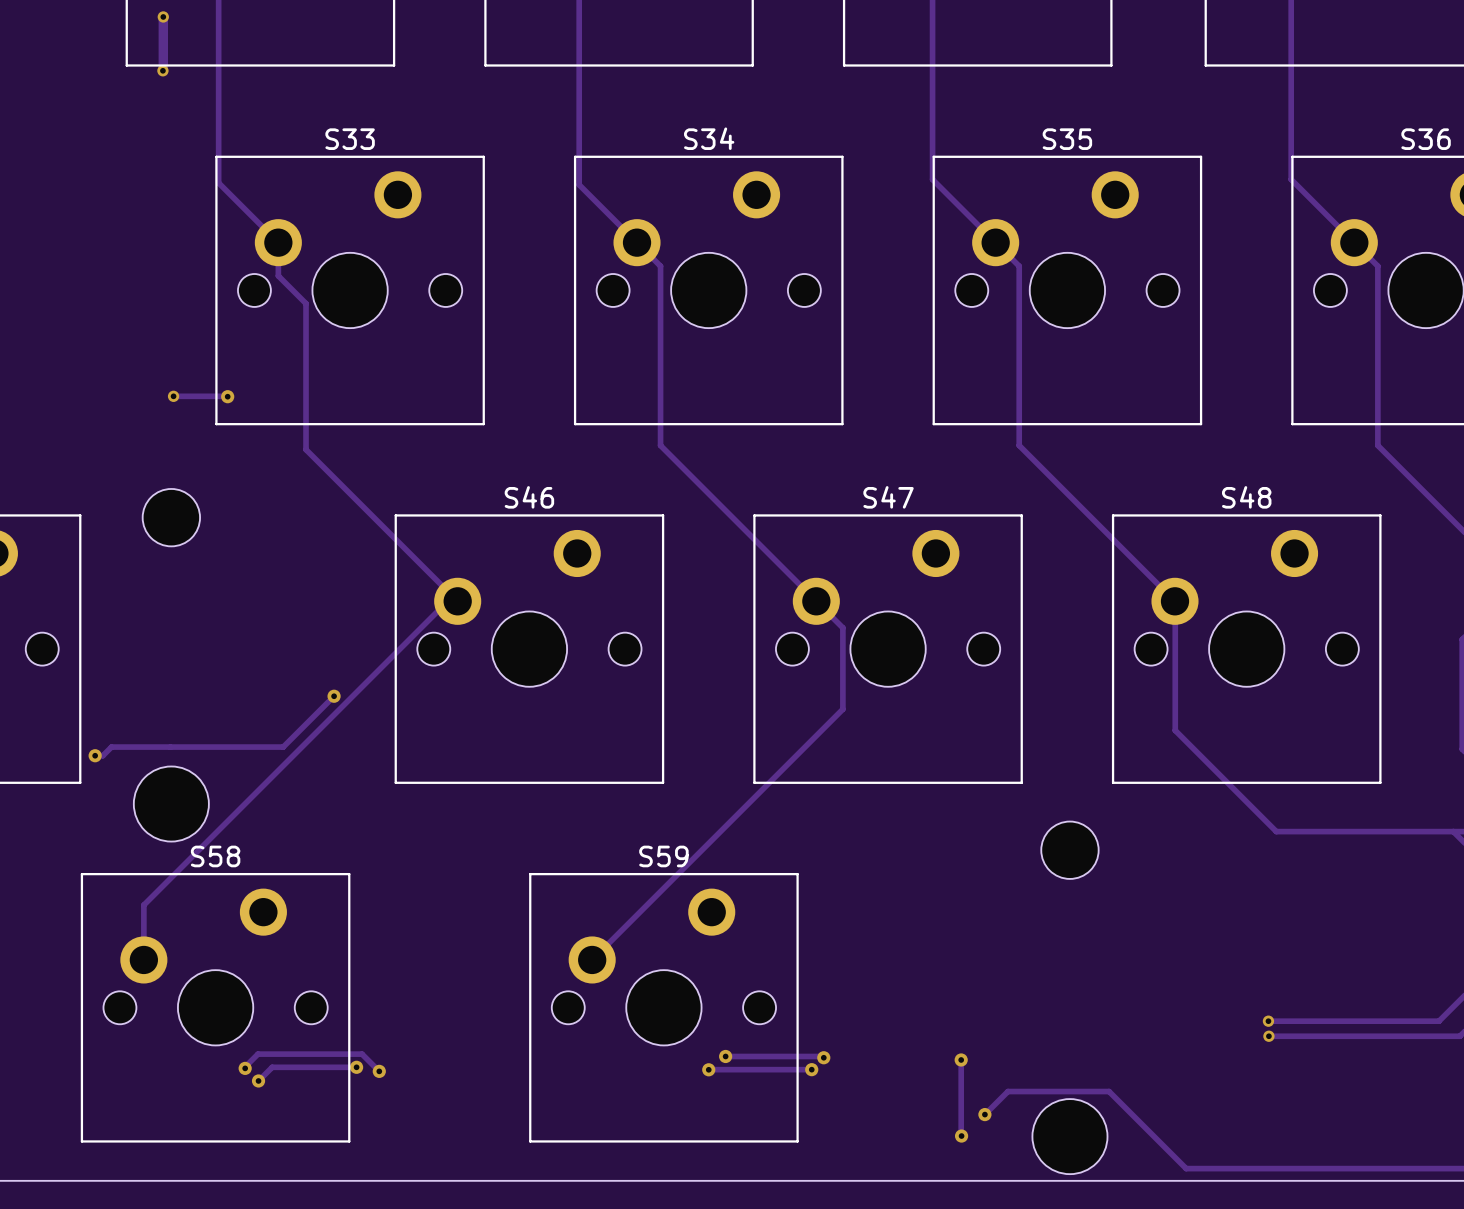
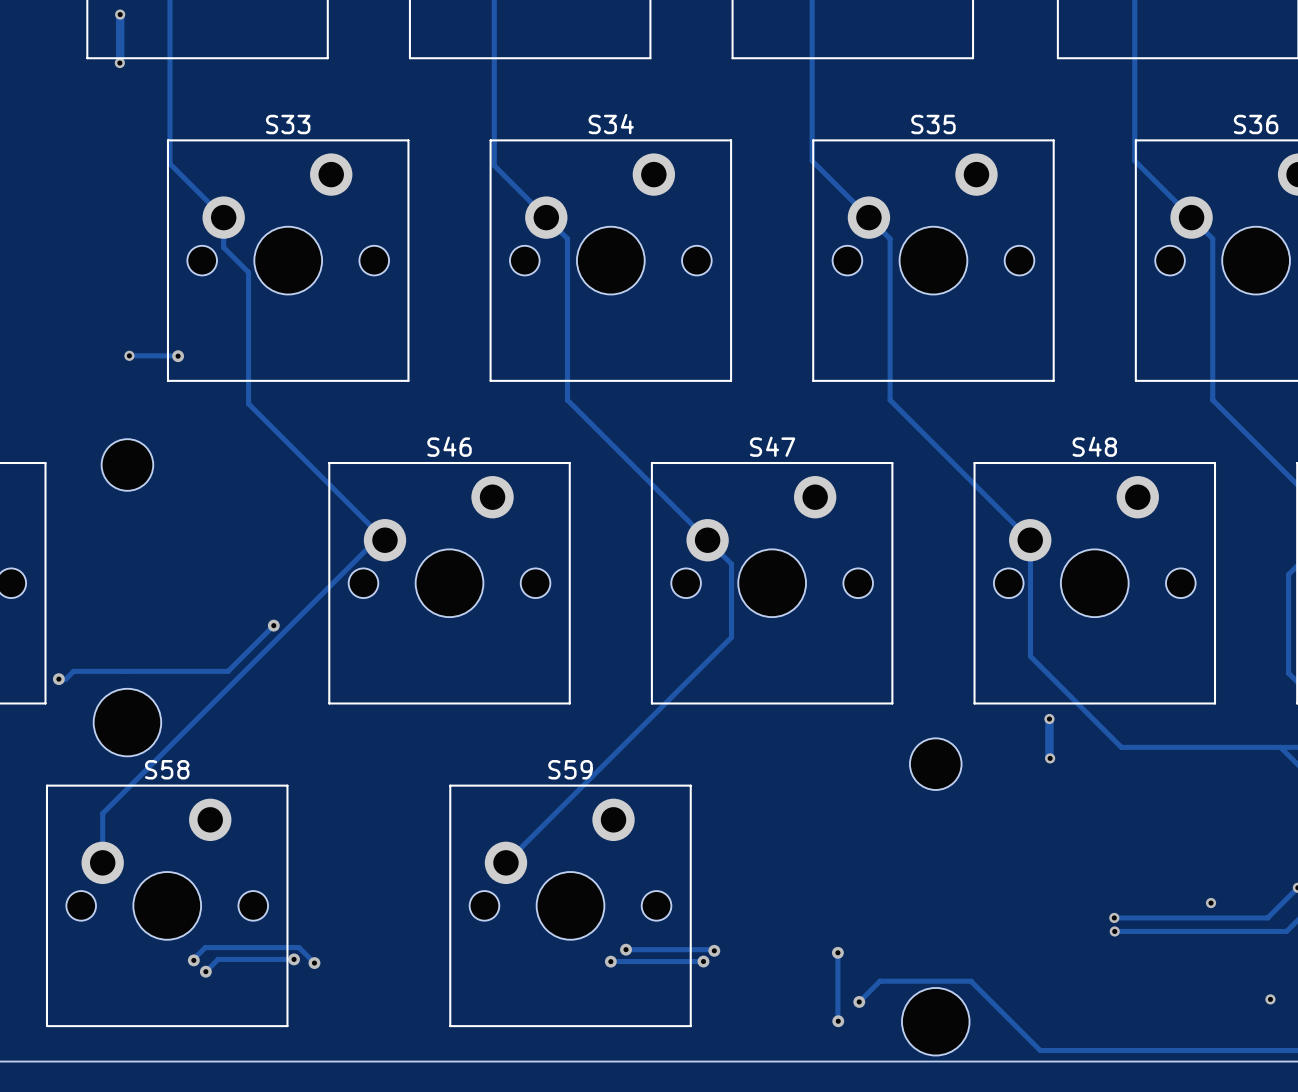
track: none -> (1049, 719) (1050, 758)
via: none -> (1049, 719)
via: none -> (1050, 758)
via: none -> (1211, 903)
via: none -> (1270, 999)

